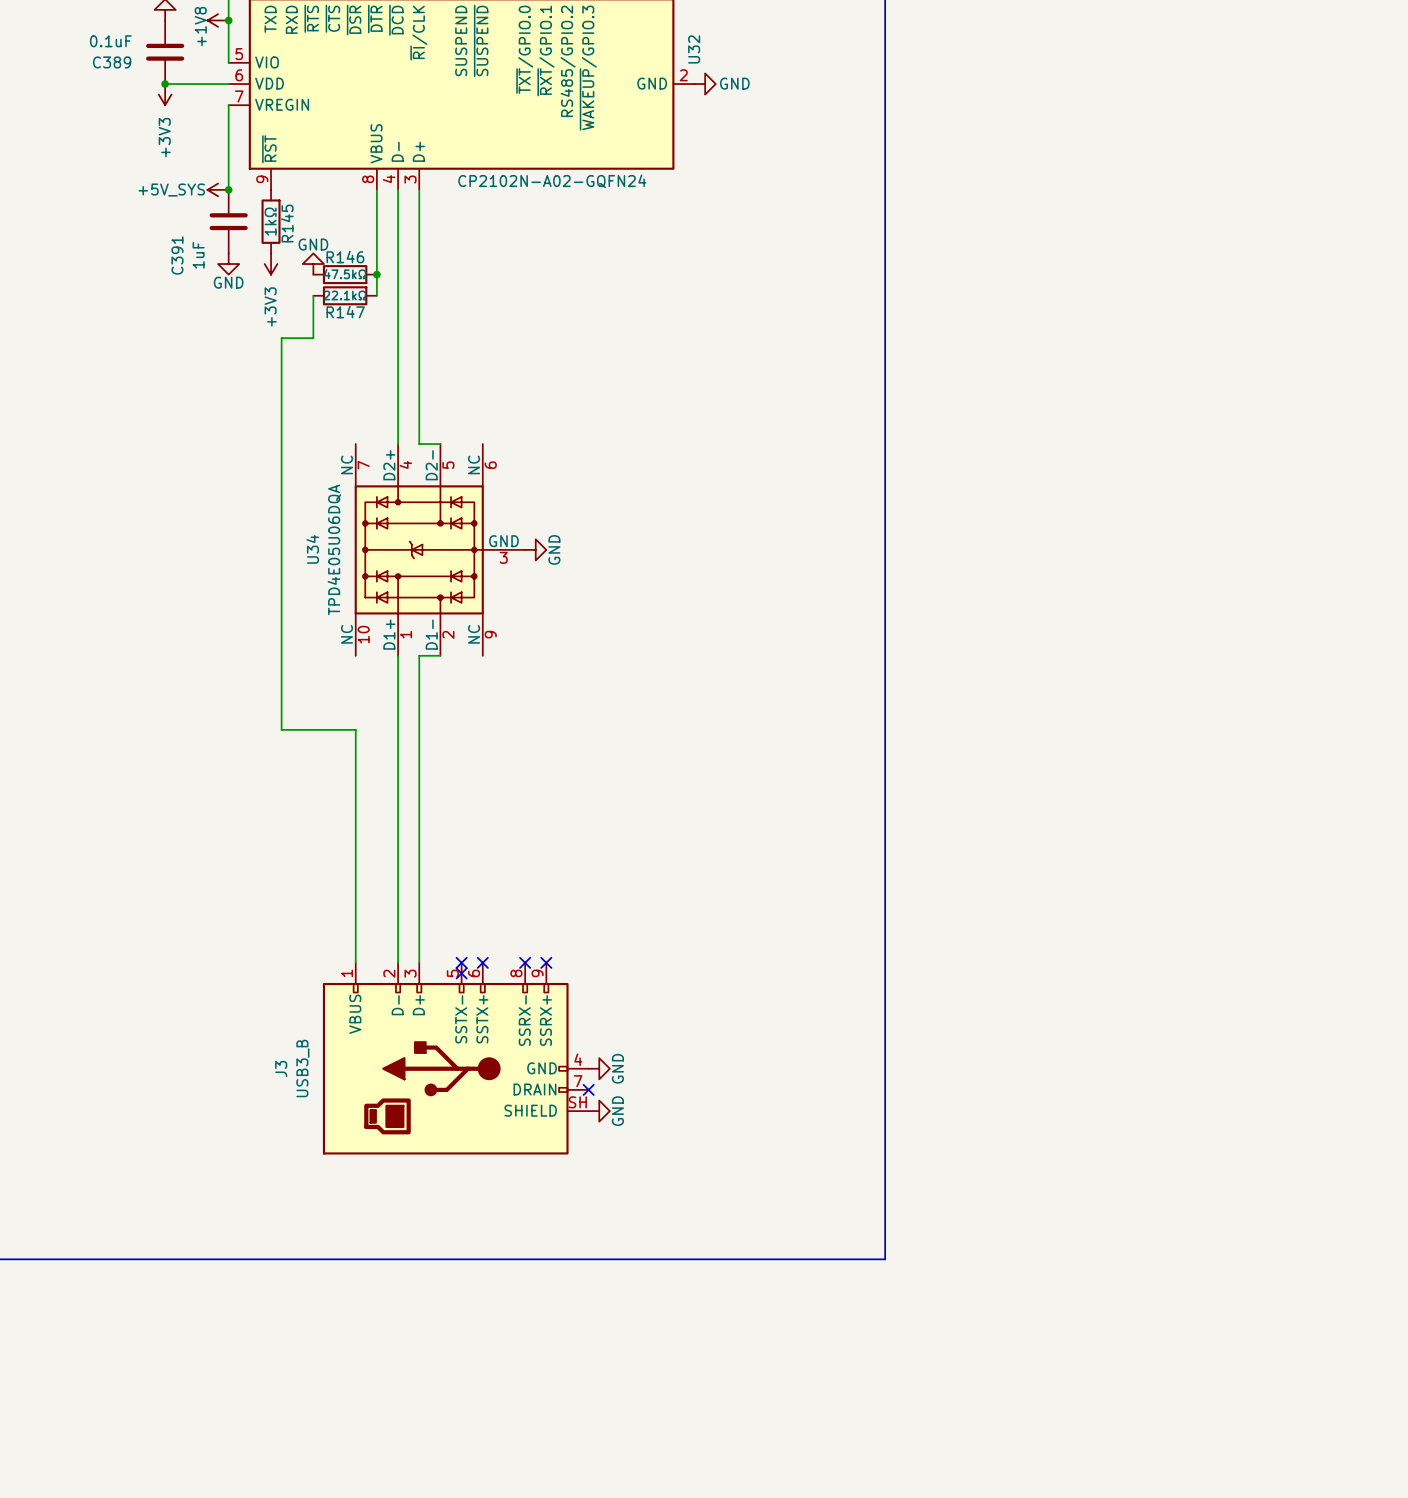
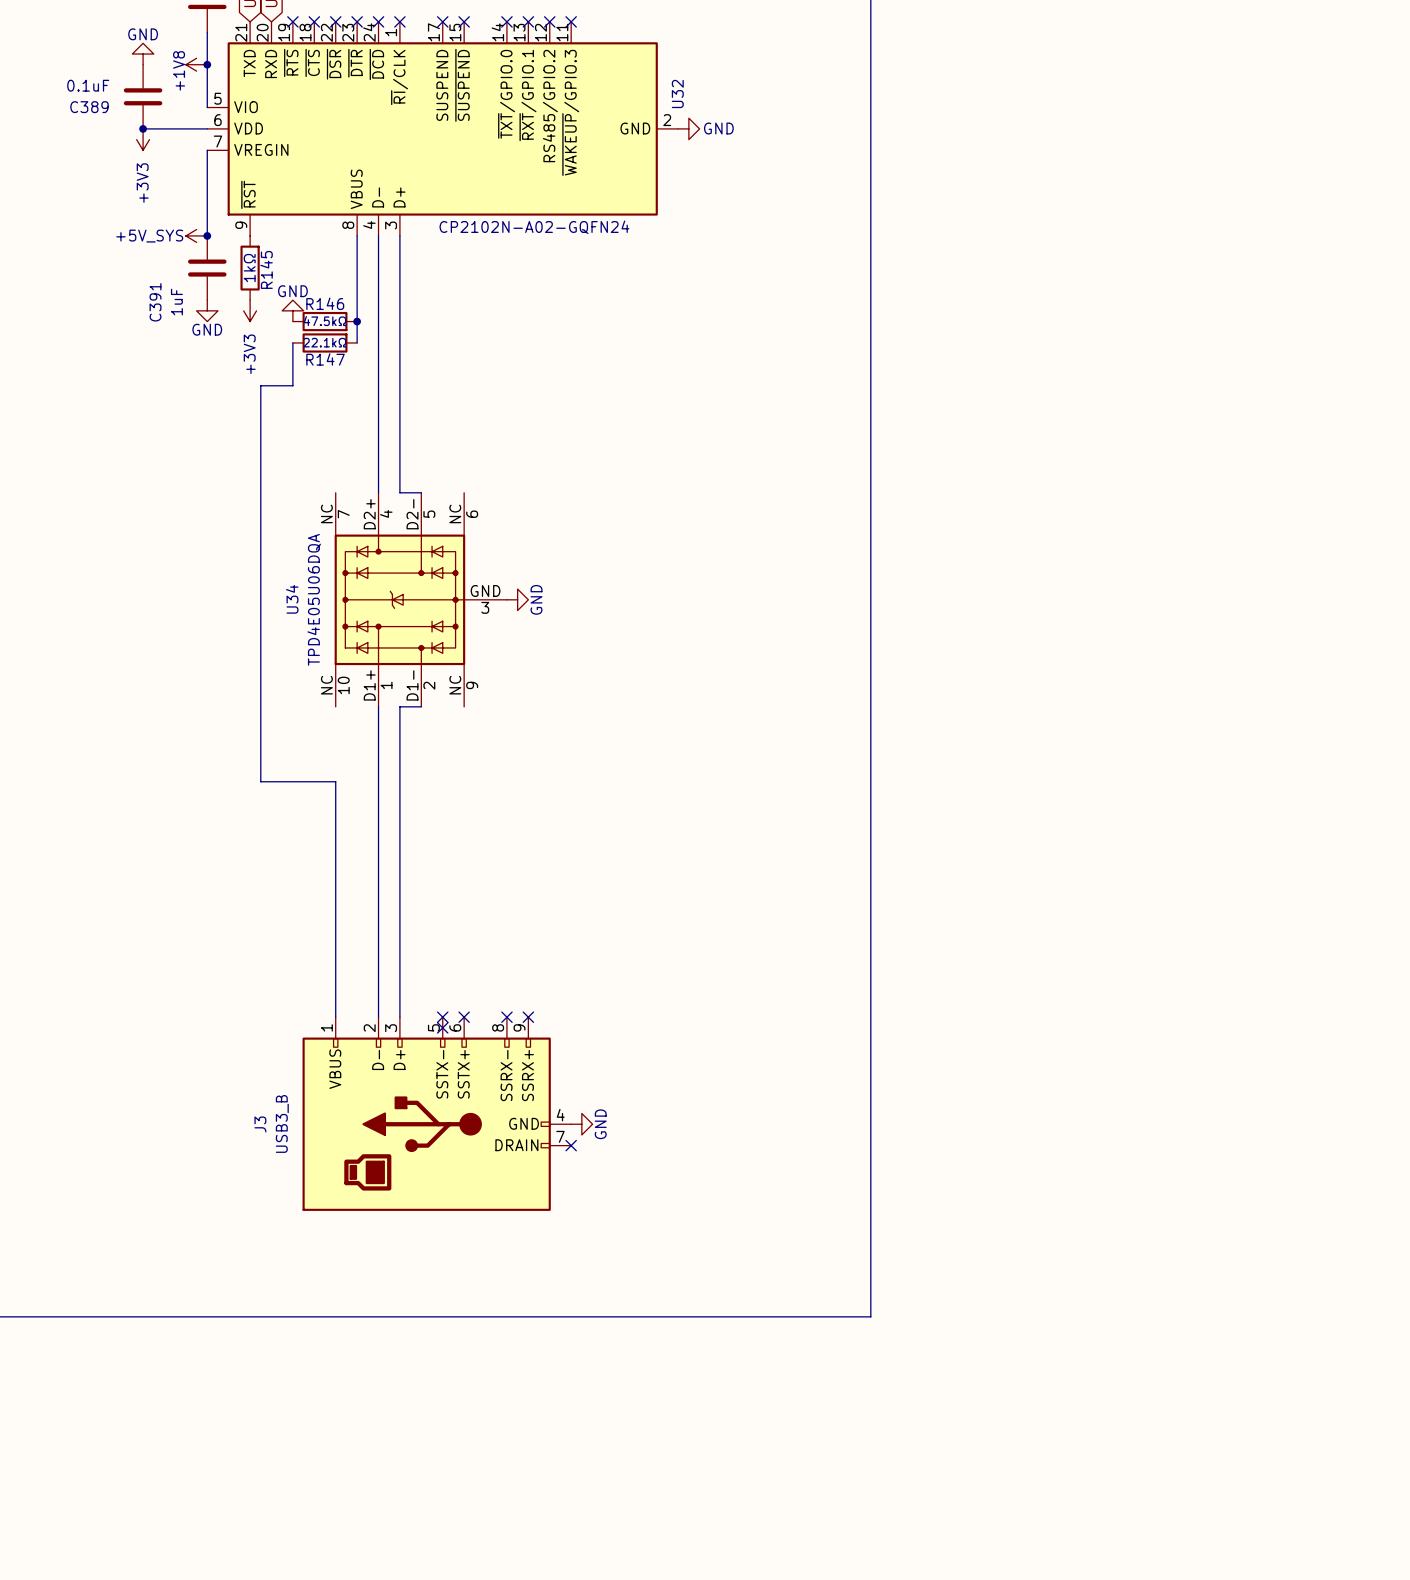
J3 symbol: [322, 962, 589, 1155] -> [302, 1017, 572, 1211]
power symbol: GND (599, 1111) -> none

